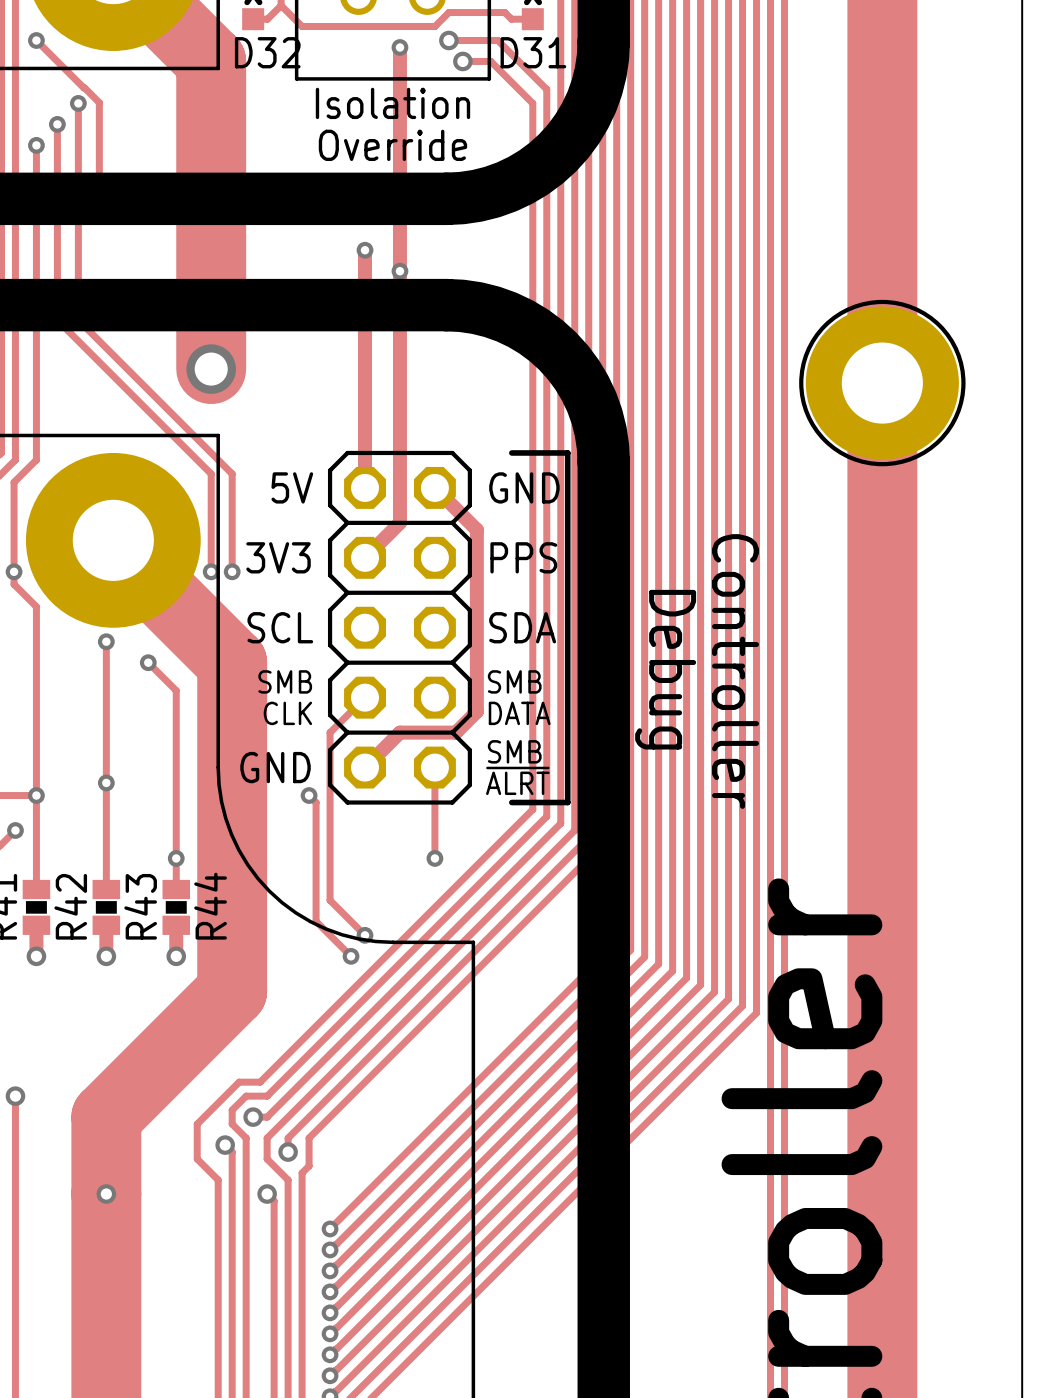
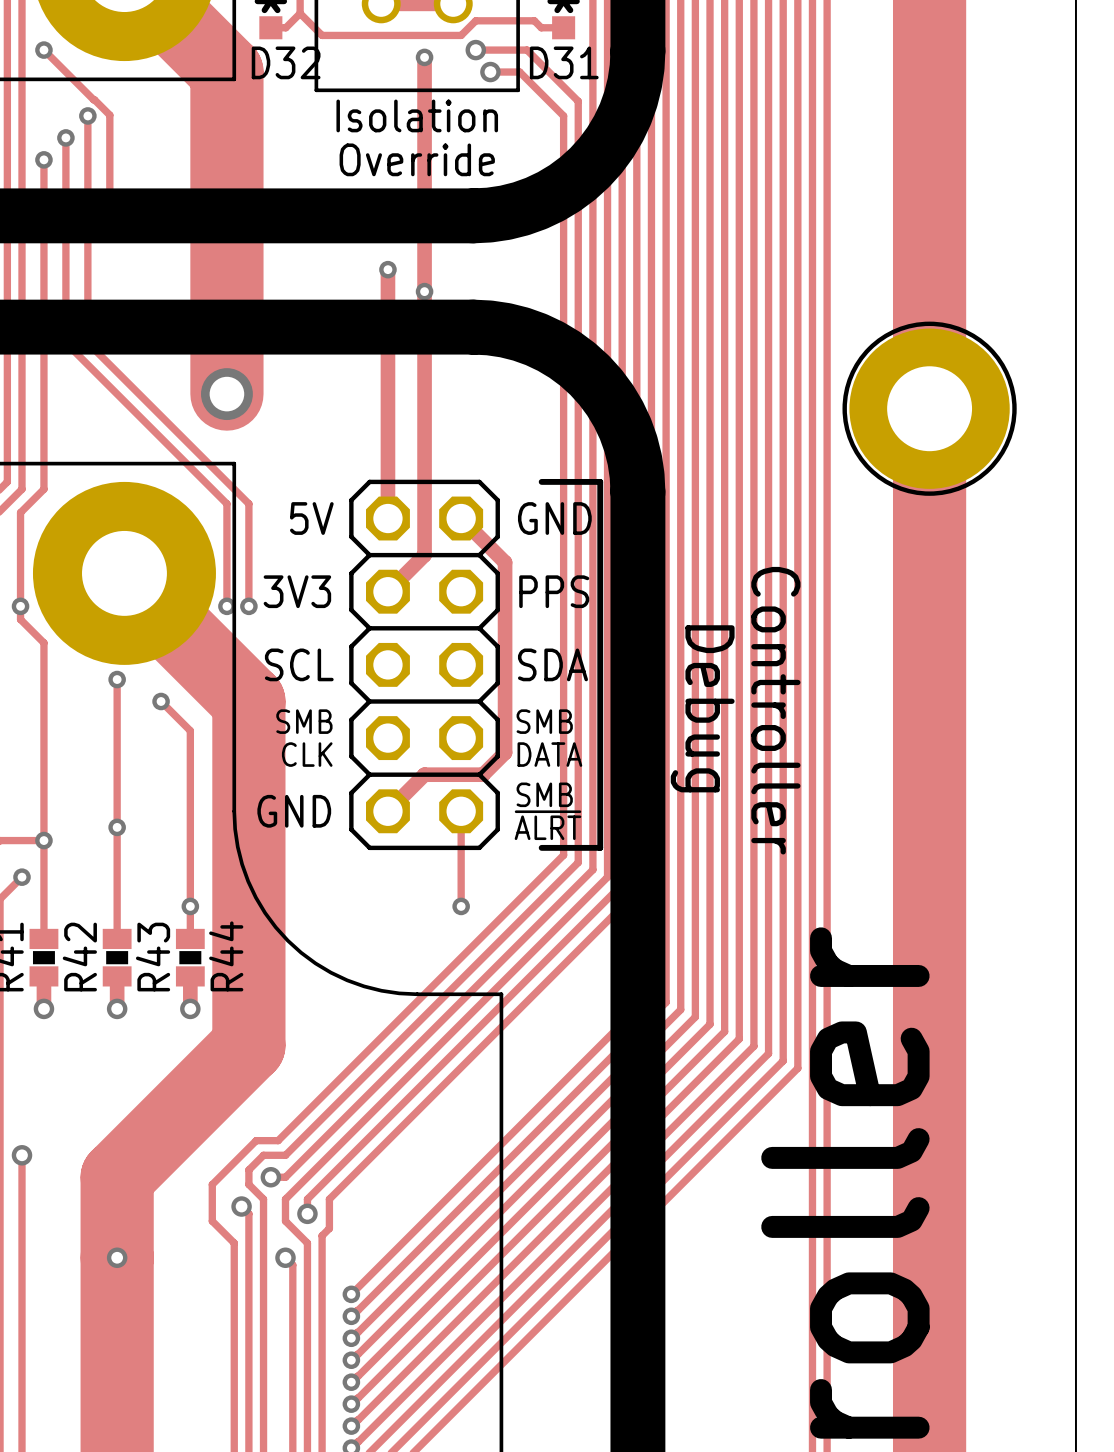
track: (365, 697) (330, 732) (330, 900) (365, 935) -> none
track: (309, 795) (316, 802) (316, 921) (351, 956) -> none
via: (309, 795) -> none
via: (365, 935) -> none
via: (351, 956) -> none

